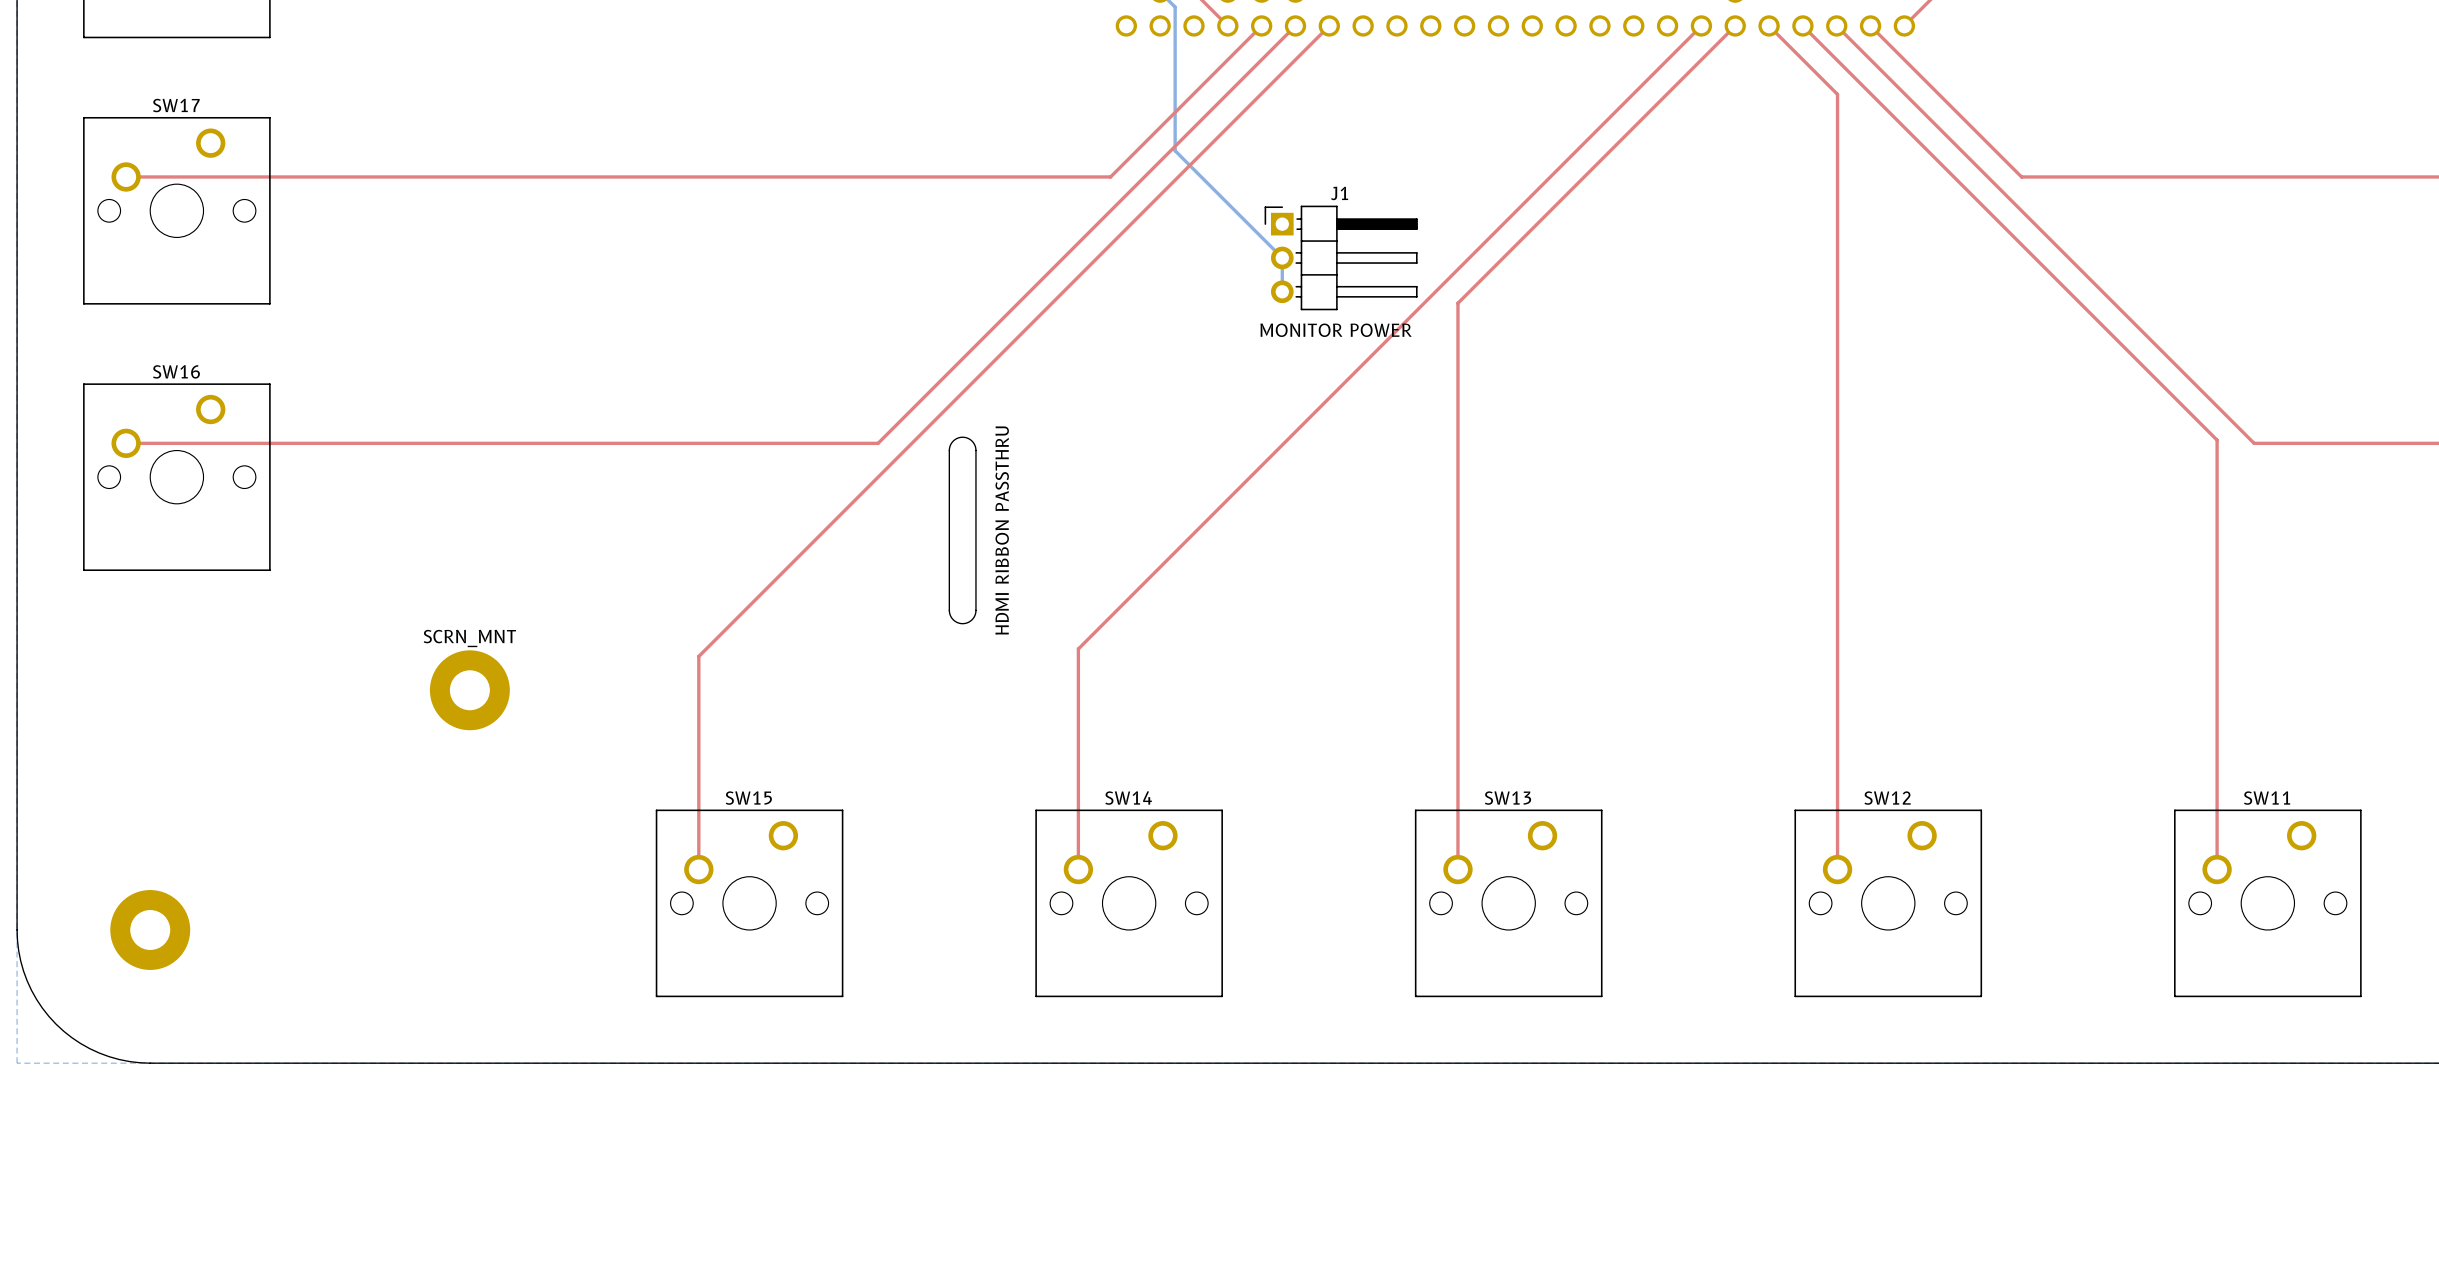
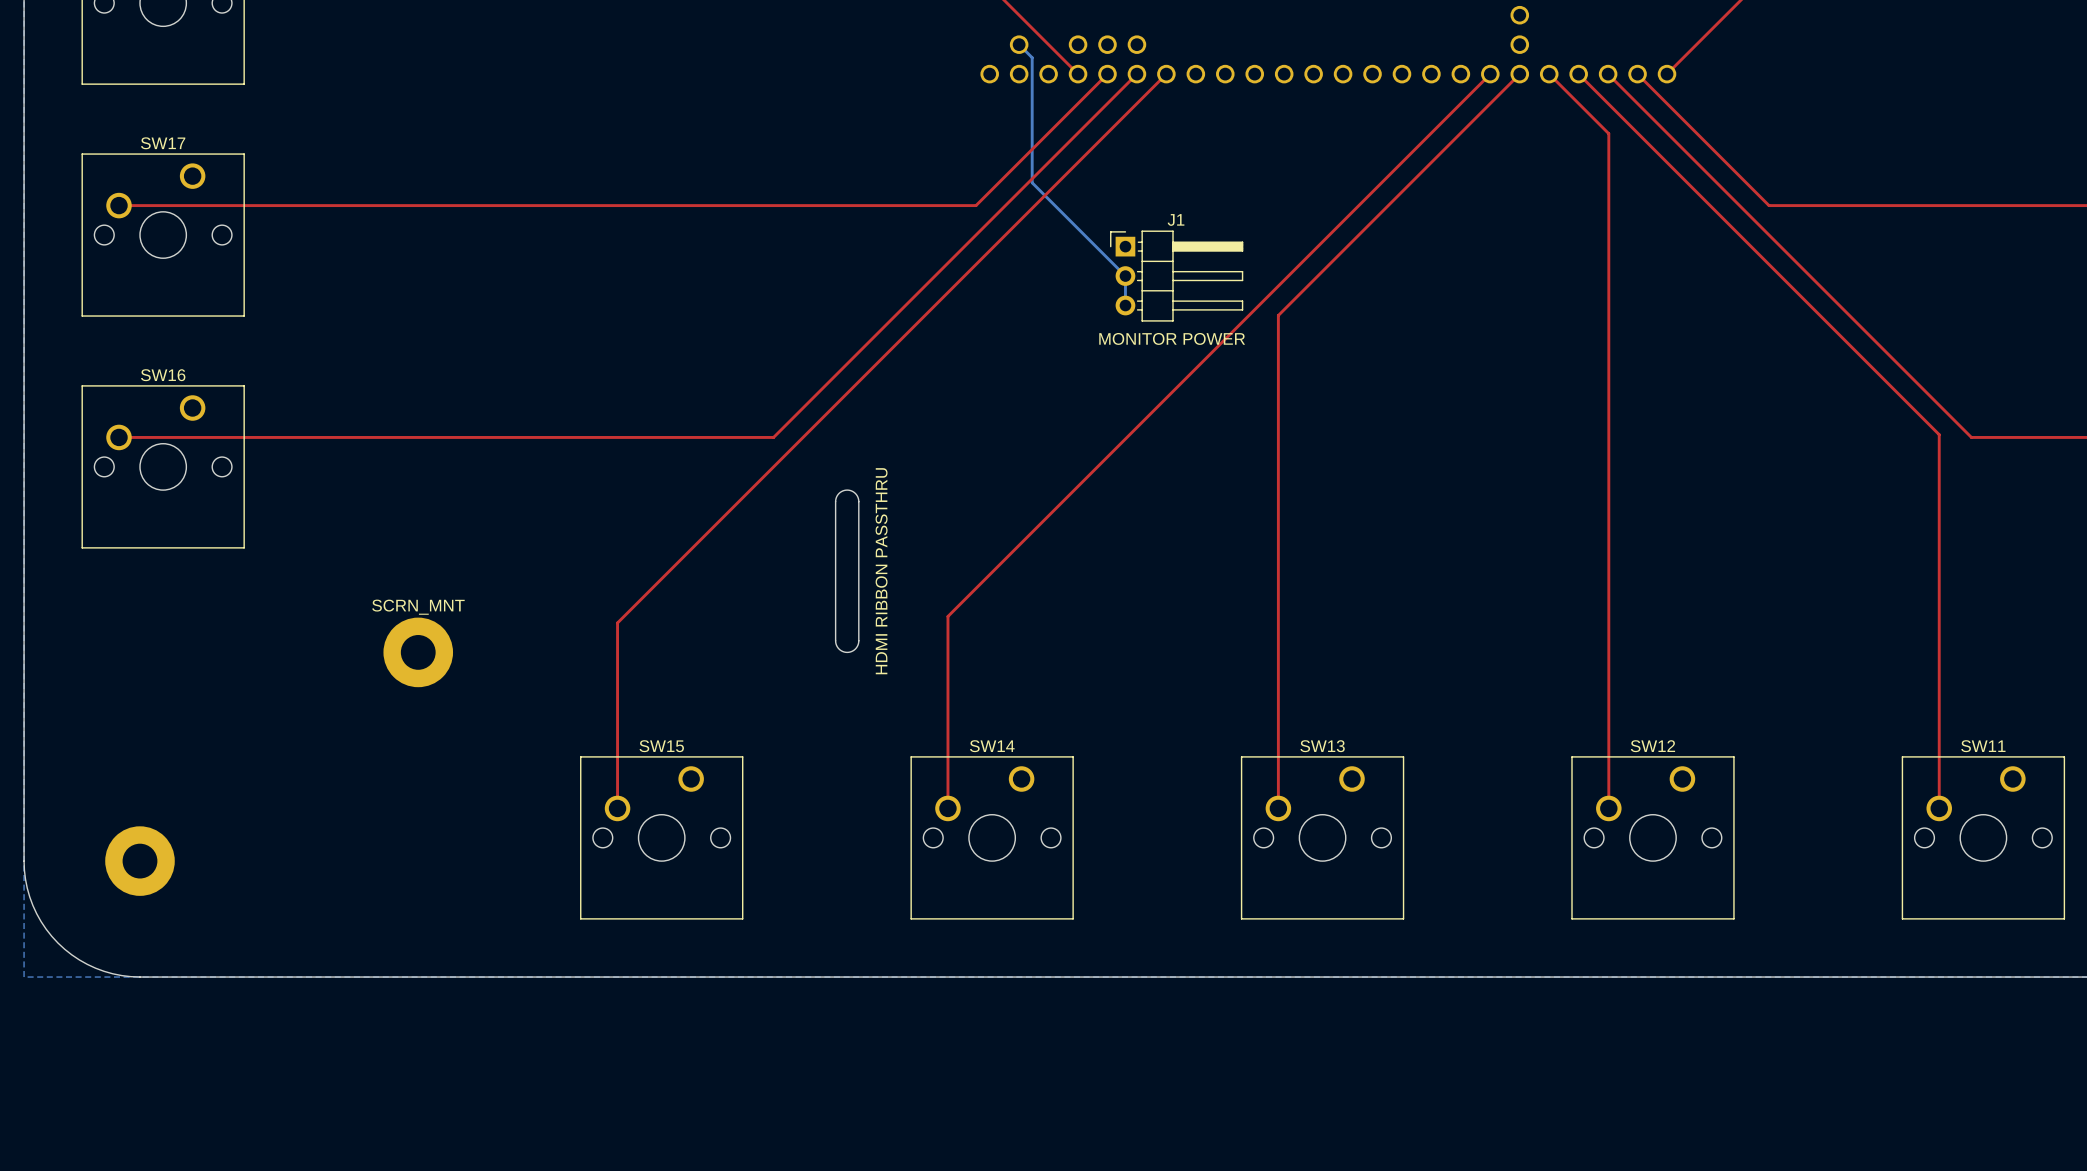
board edge: (949, 517) (949, 448) (953, 441) (962, 437) (972, 441) (975, 448) (975, 517) -> (835, 501) (839, 493) (847, 490) (855, 493) (858, 501)
text position: HDMI RIBBON PASSTHRU (1002, 530) -> HDMI RIBBON PASSTHRU (881, 571)
board edge: (949, 610) (953, 619) (962, 623) (972, 619) (975, 610) -> (835, 582) (835, 642) (840, 650) (847, 652) (854, 650) (858, 642) (858, 582)

